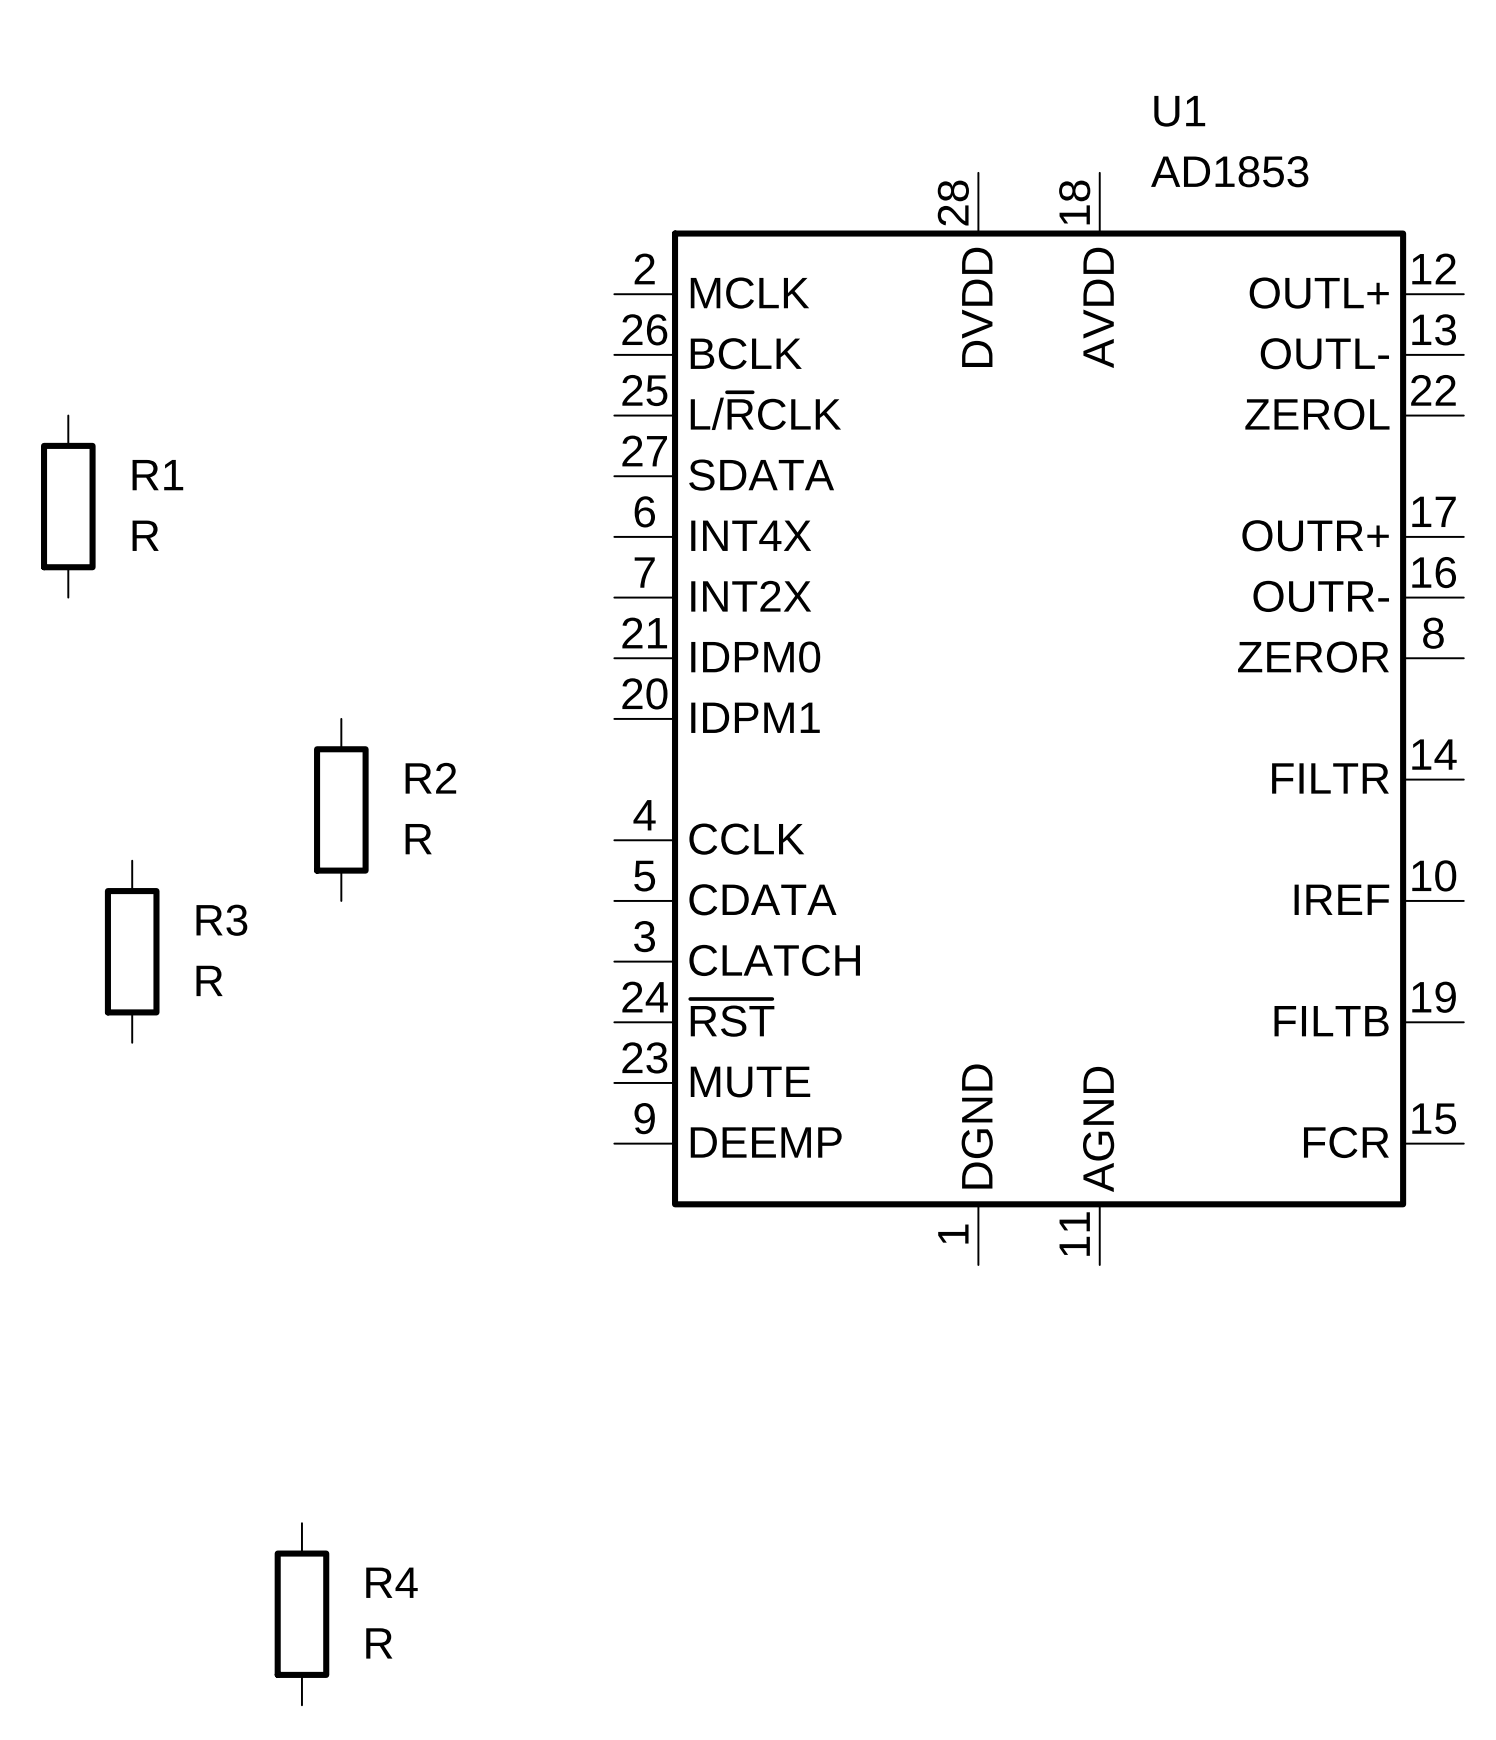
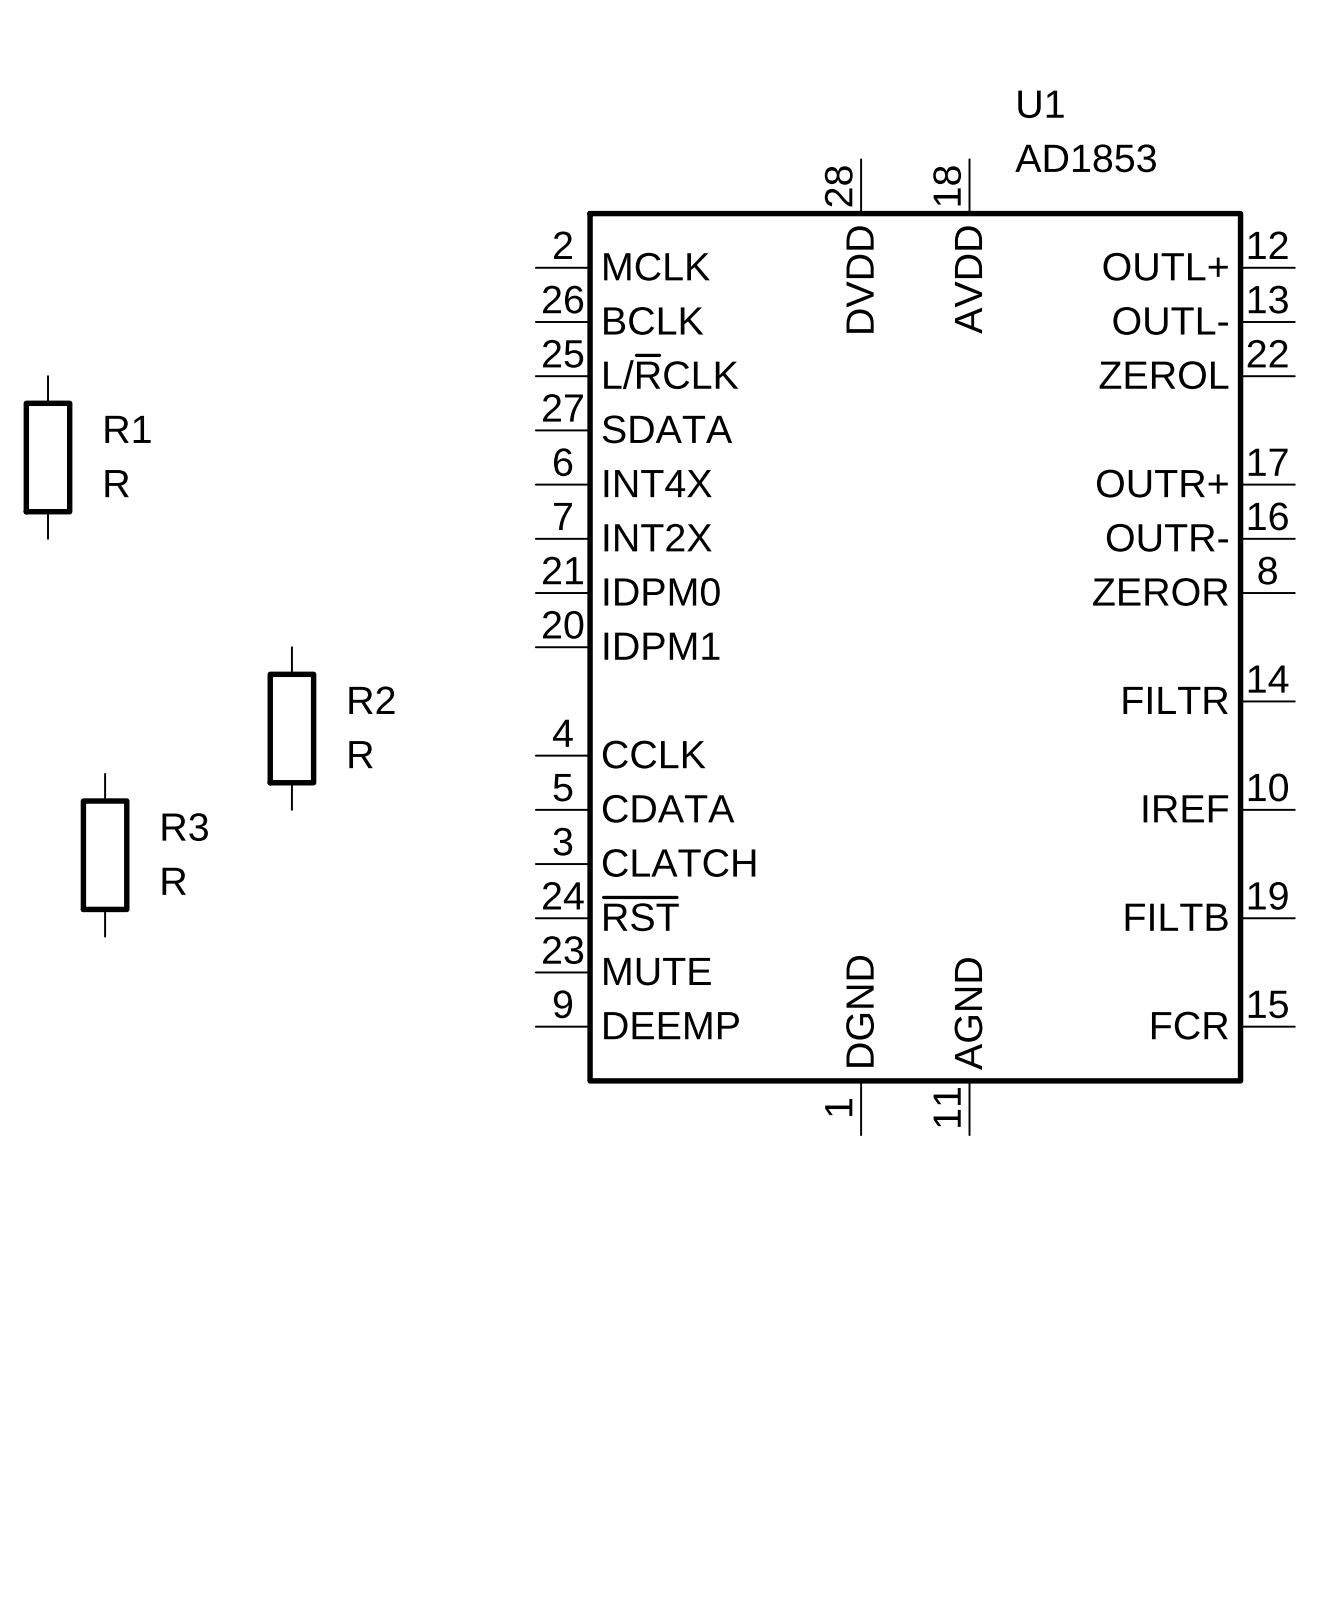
R4: R (301, 1614) -> none

